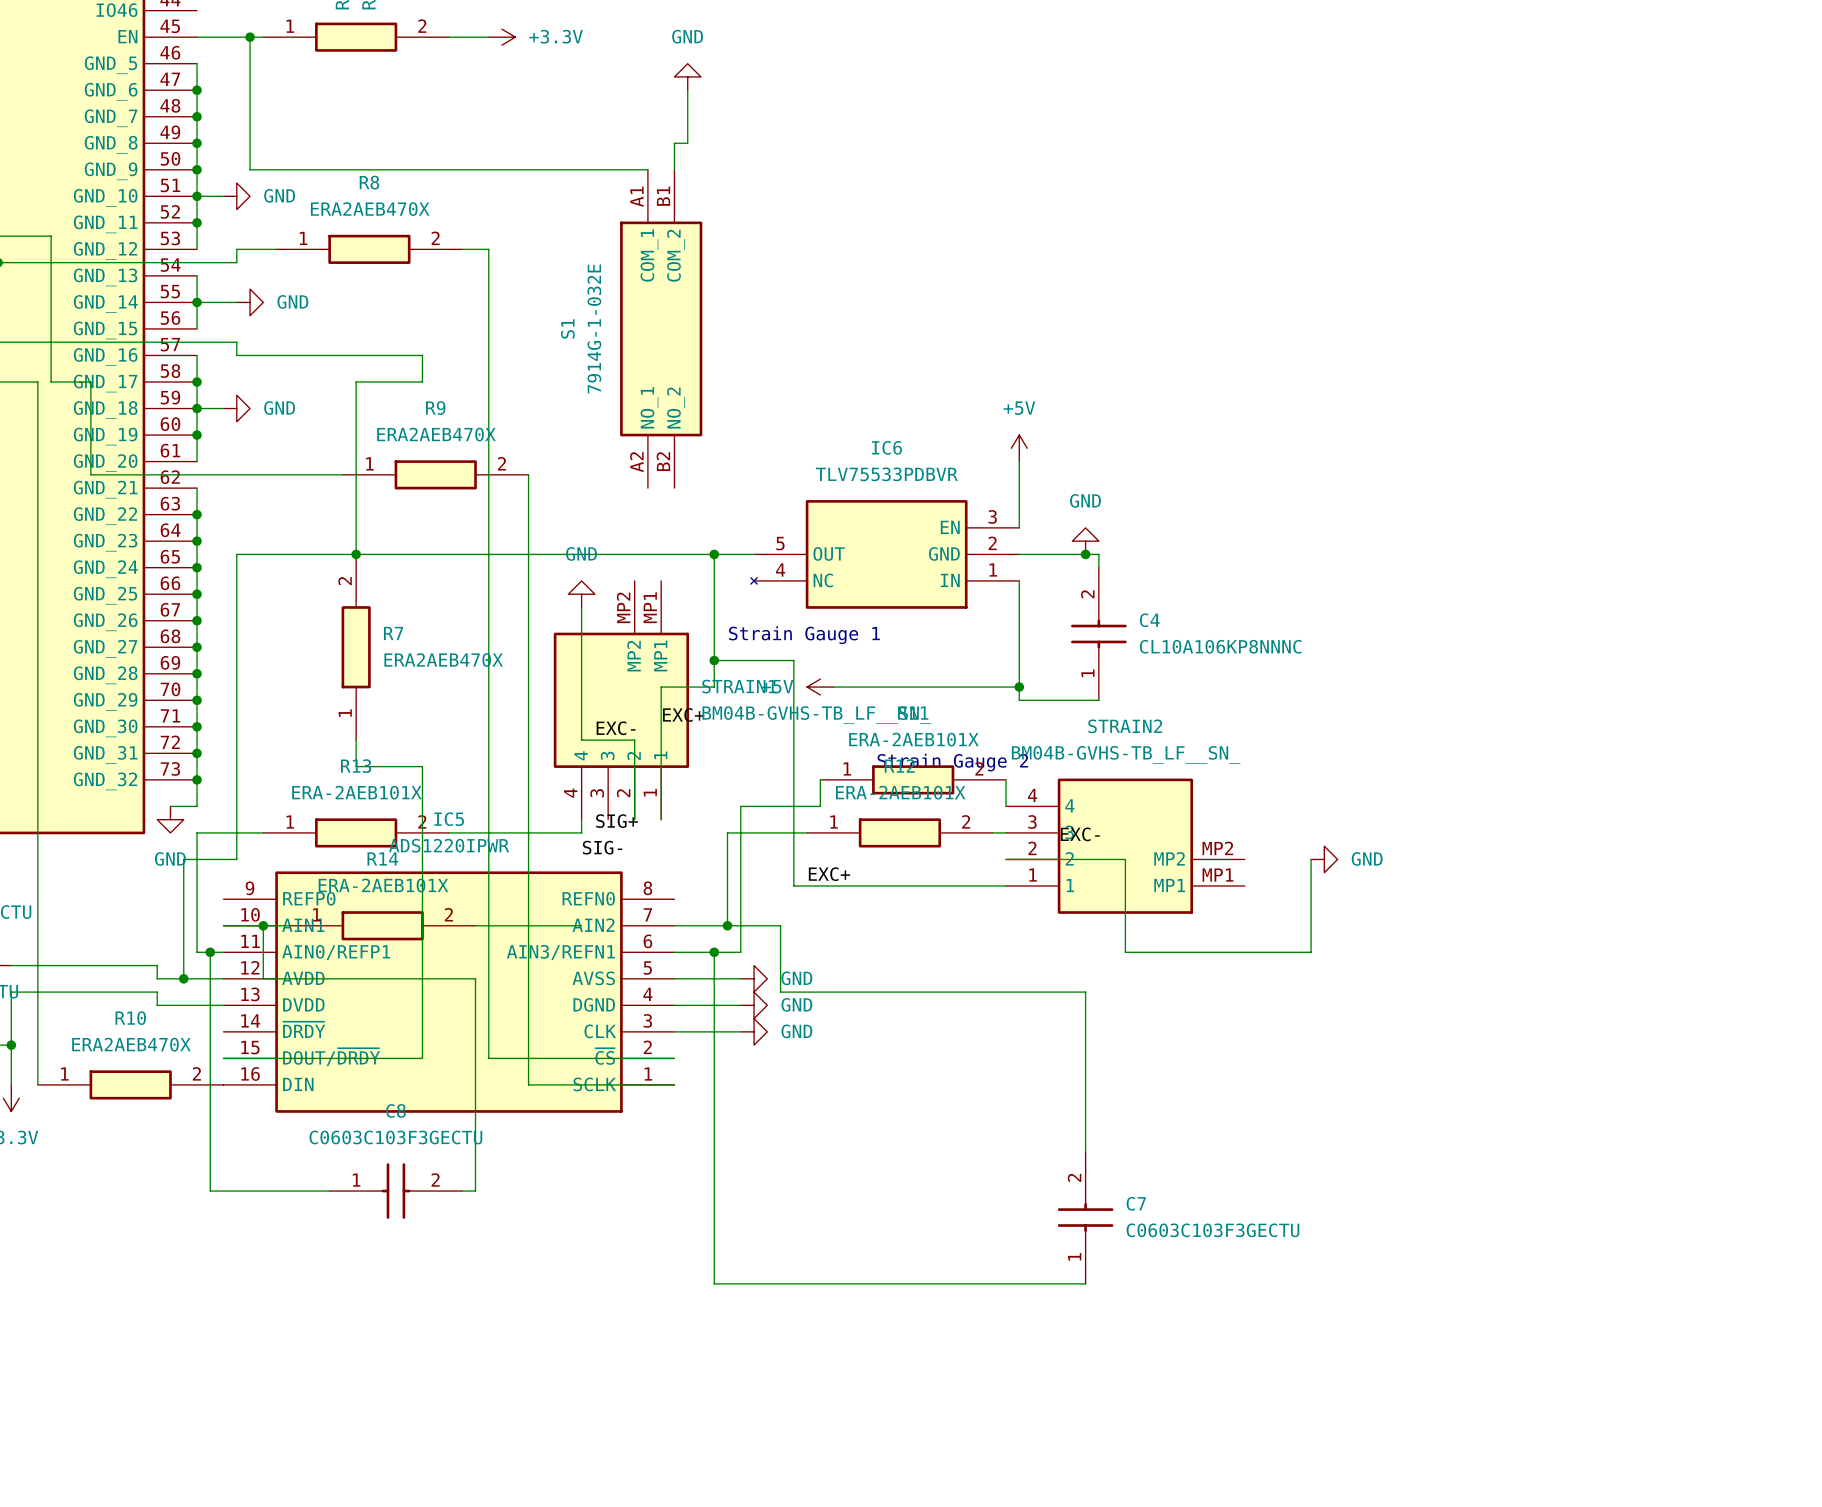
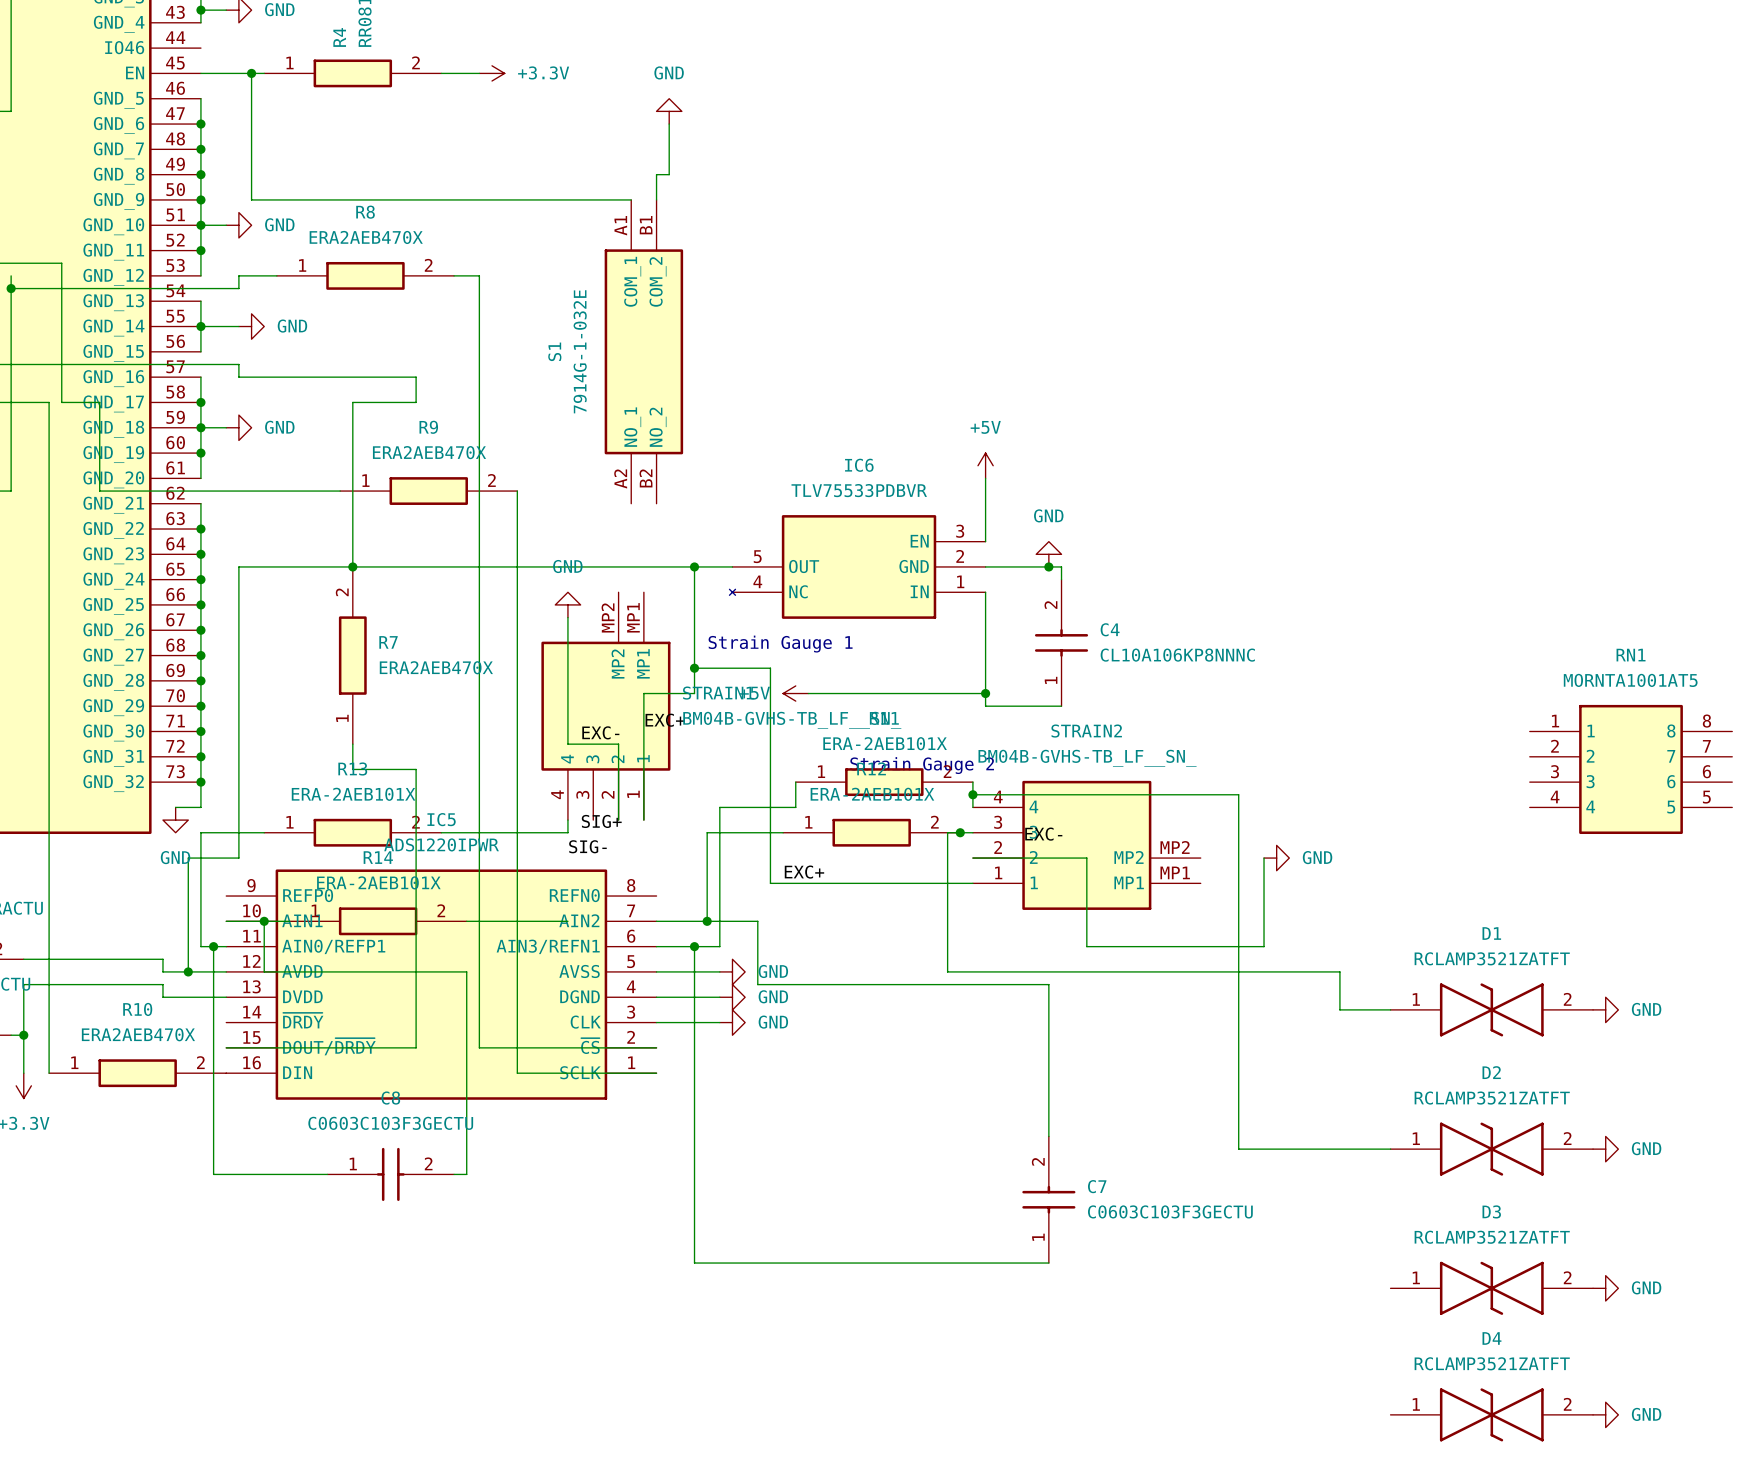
RN1: none -> MORNTA1001AT5 (1631, 769)
wire: none -> (972, 794) (1238, 794) (1238, 1149) (1390, 1149)
junction: none -> (972, 794)
wire: none -> (960, 832) (947, 832) (947, 971) (1339, 971) (1339, 1009) (1390, 1009)
junction: none -> (960, 832)
D1: none -> RCLAMP3521ZATFT (1491, 1009)
power symbol: none -> GND (1605, 1009)
D2: none -> RCLAMP3521ZATFT (1491, 1149)
power symbol: none -> GND (1605, 1149)
D3: none -> RCLAMP3521ZATFT (1491, 1288)
power symbol: none -> GND (1605, 1288)
D4: none -> RCLAMP3521ZATFT (1491, 1414)
power symbol: none -> GND (1605, 1414)

